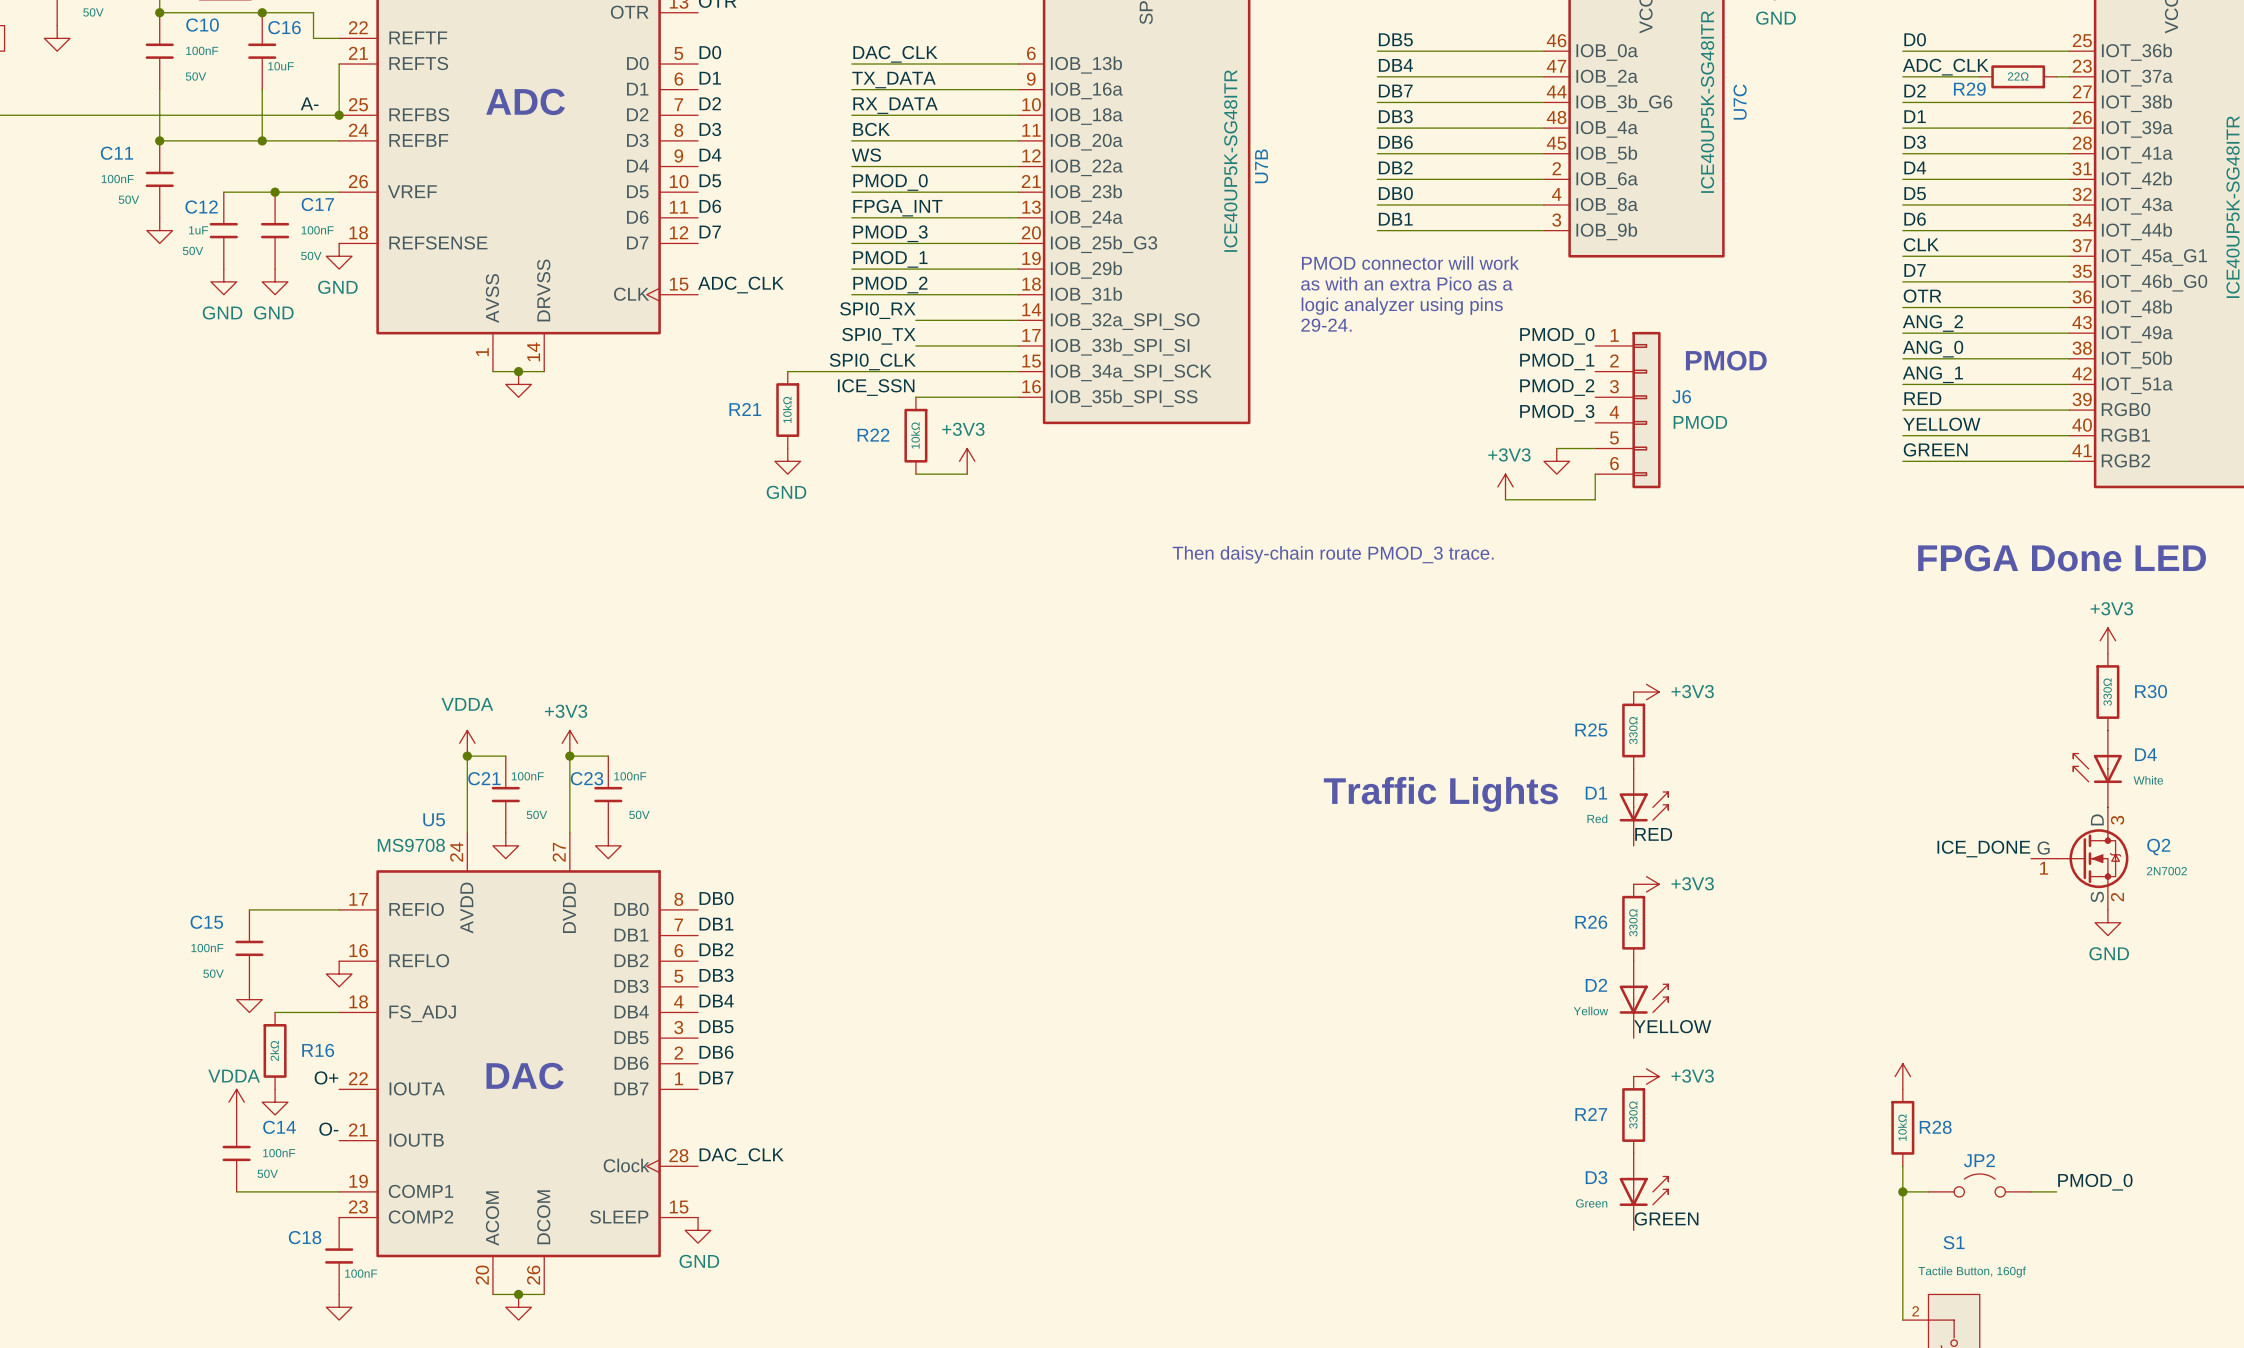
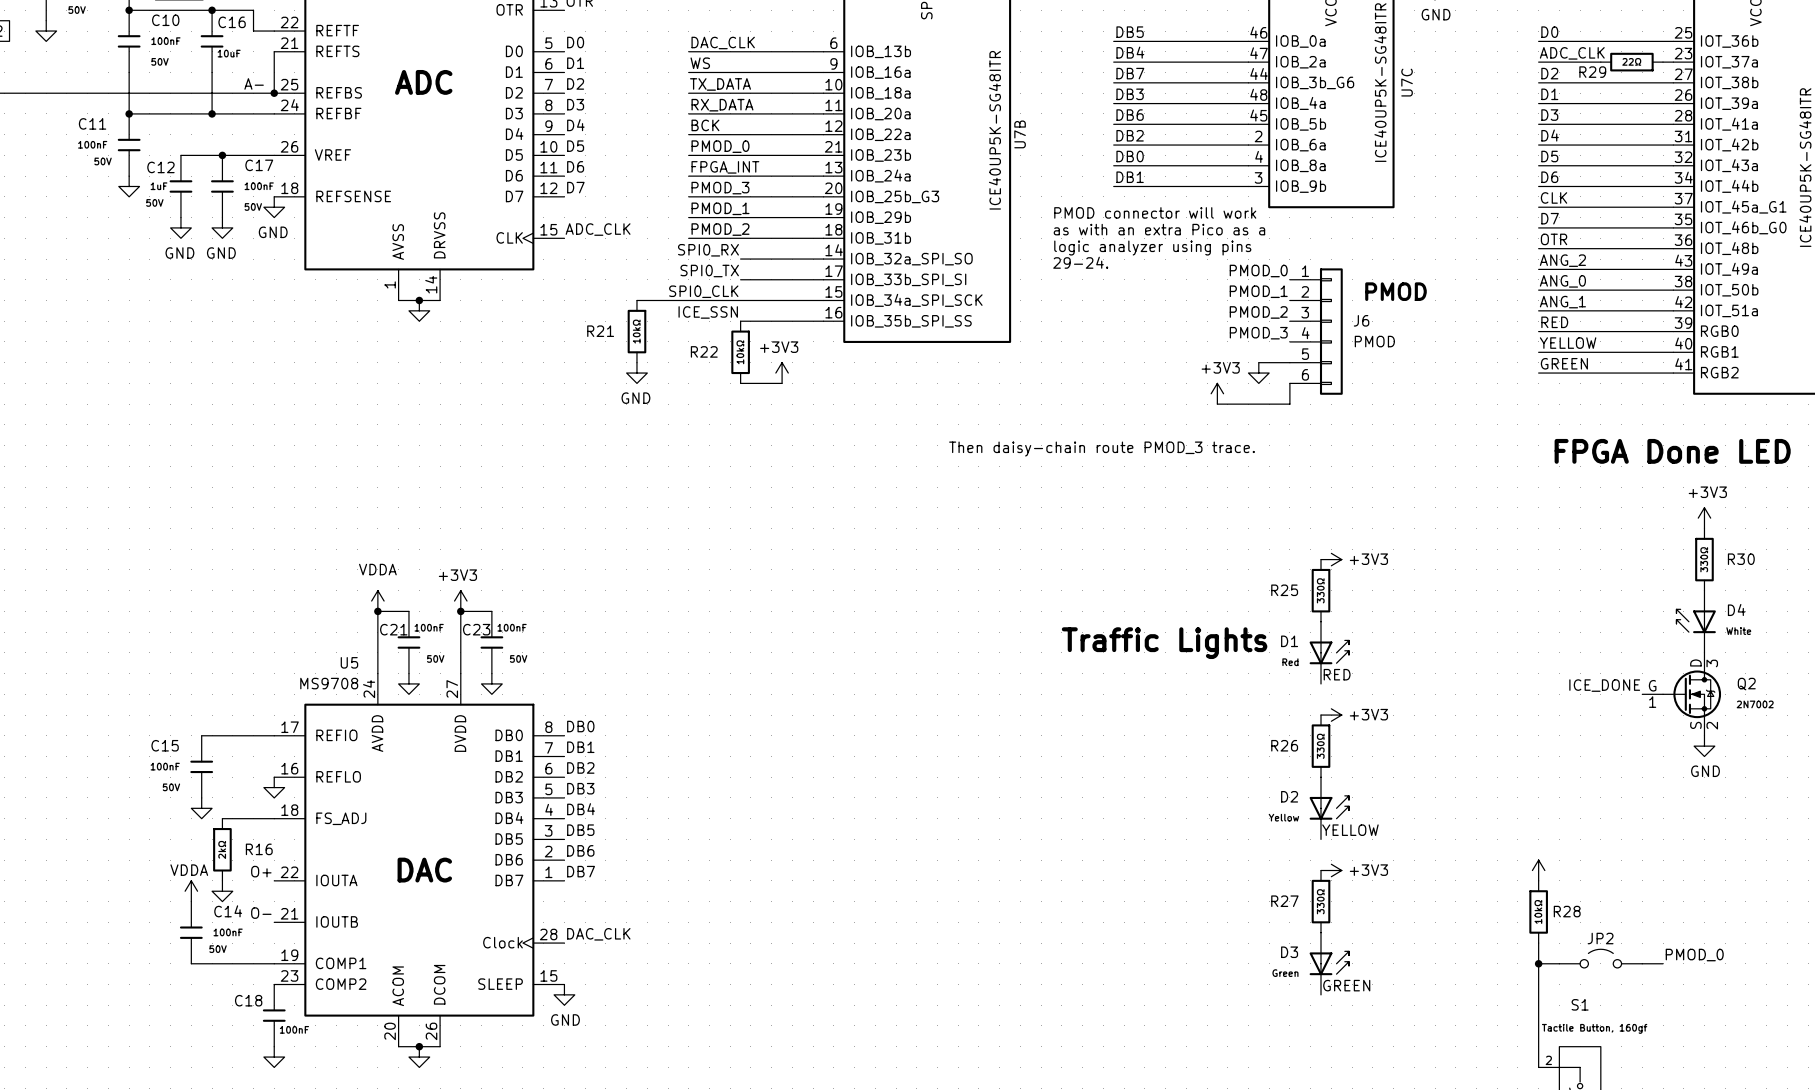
label: TX_DATA (893, 80) -> WS (700, 63)
label: RX_DATA (895, 105) -> TX_DATA (720, 84)
label: BCK (871, 129) -> RX_DATA (722, 105)
label: WS (866, 155) -> BCK (705, 125)

